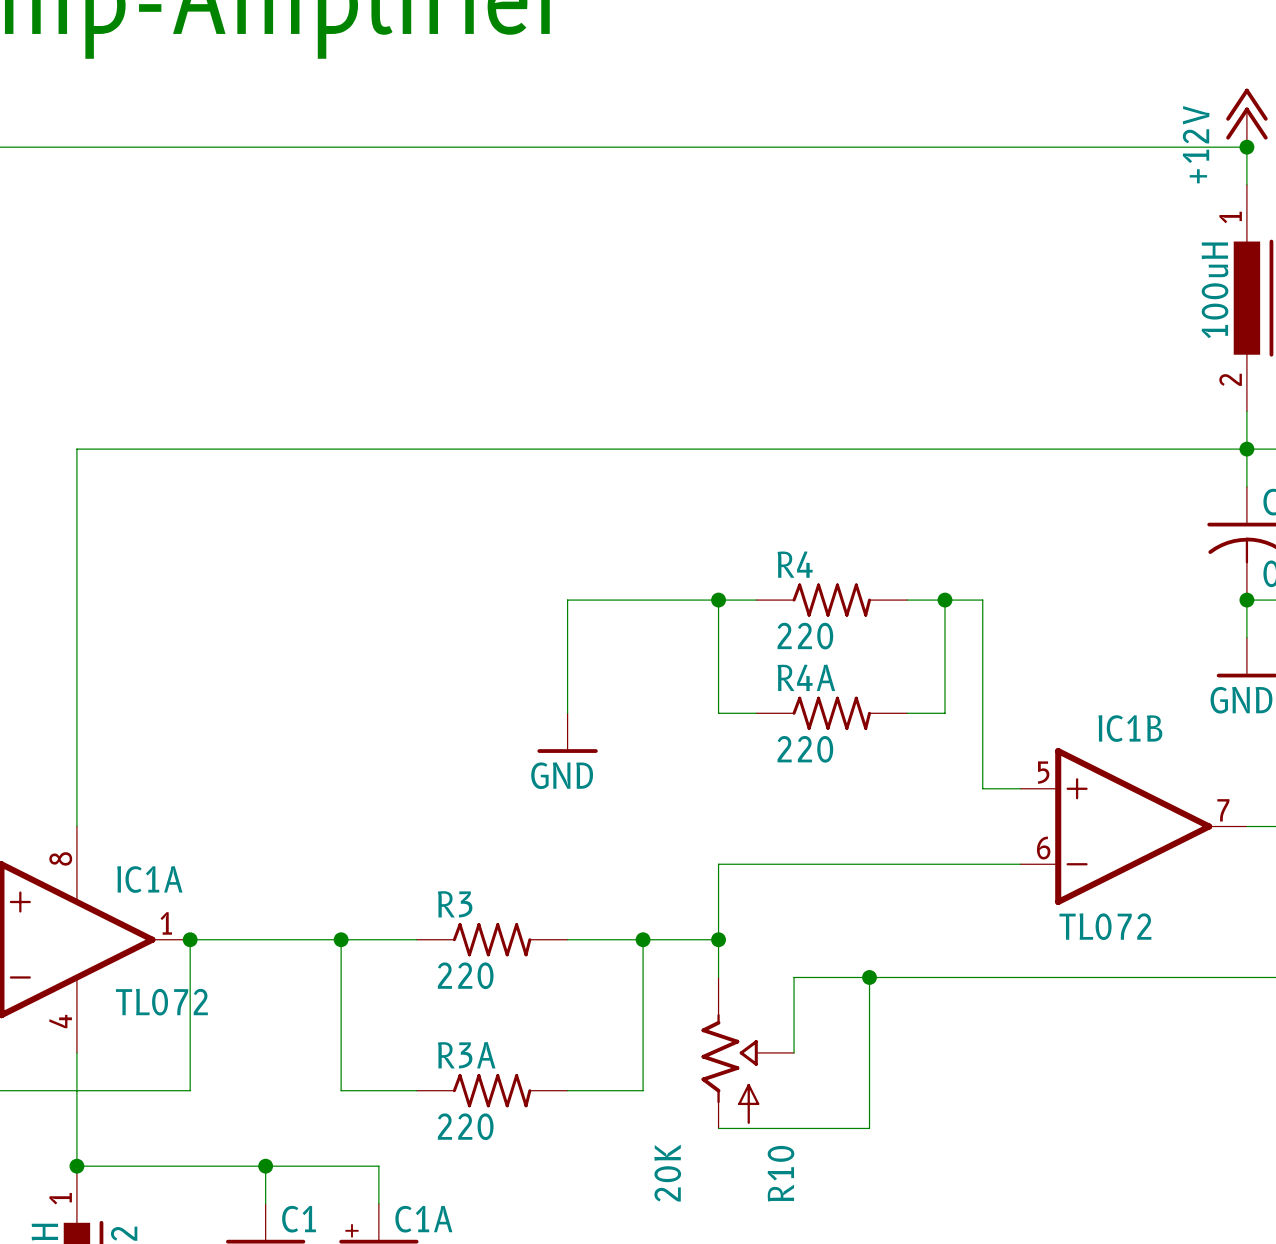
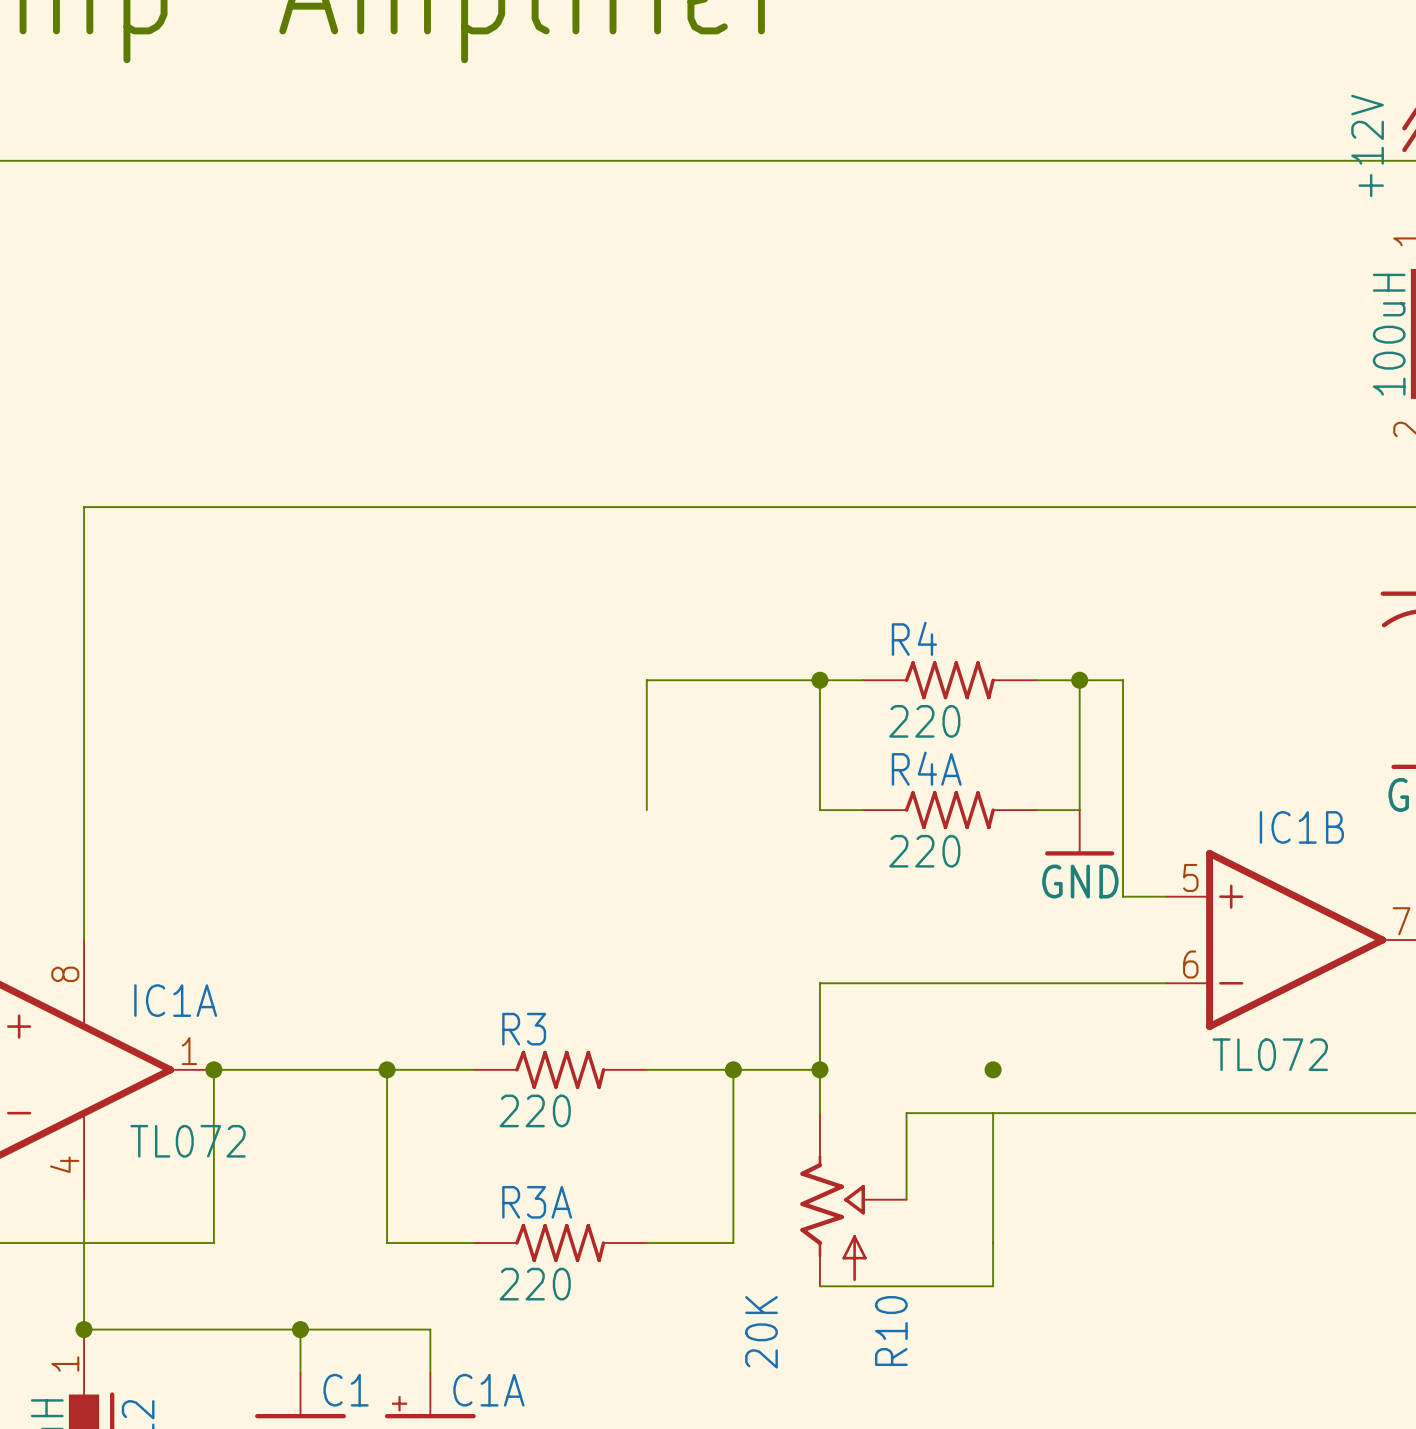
power symbol: GND (567, 733) -> none
power symbol: none -> GND (1079, 832)
junction position: (869, 977) -> (993, 1069)

